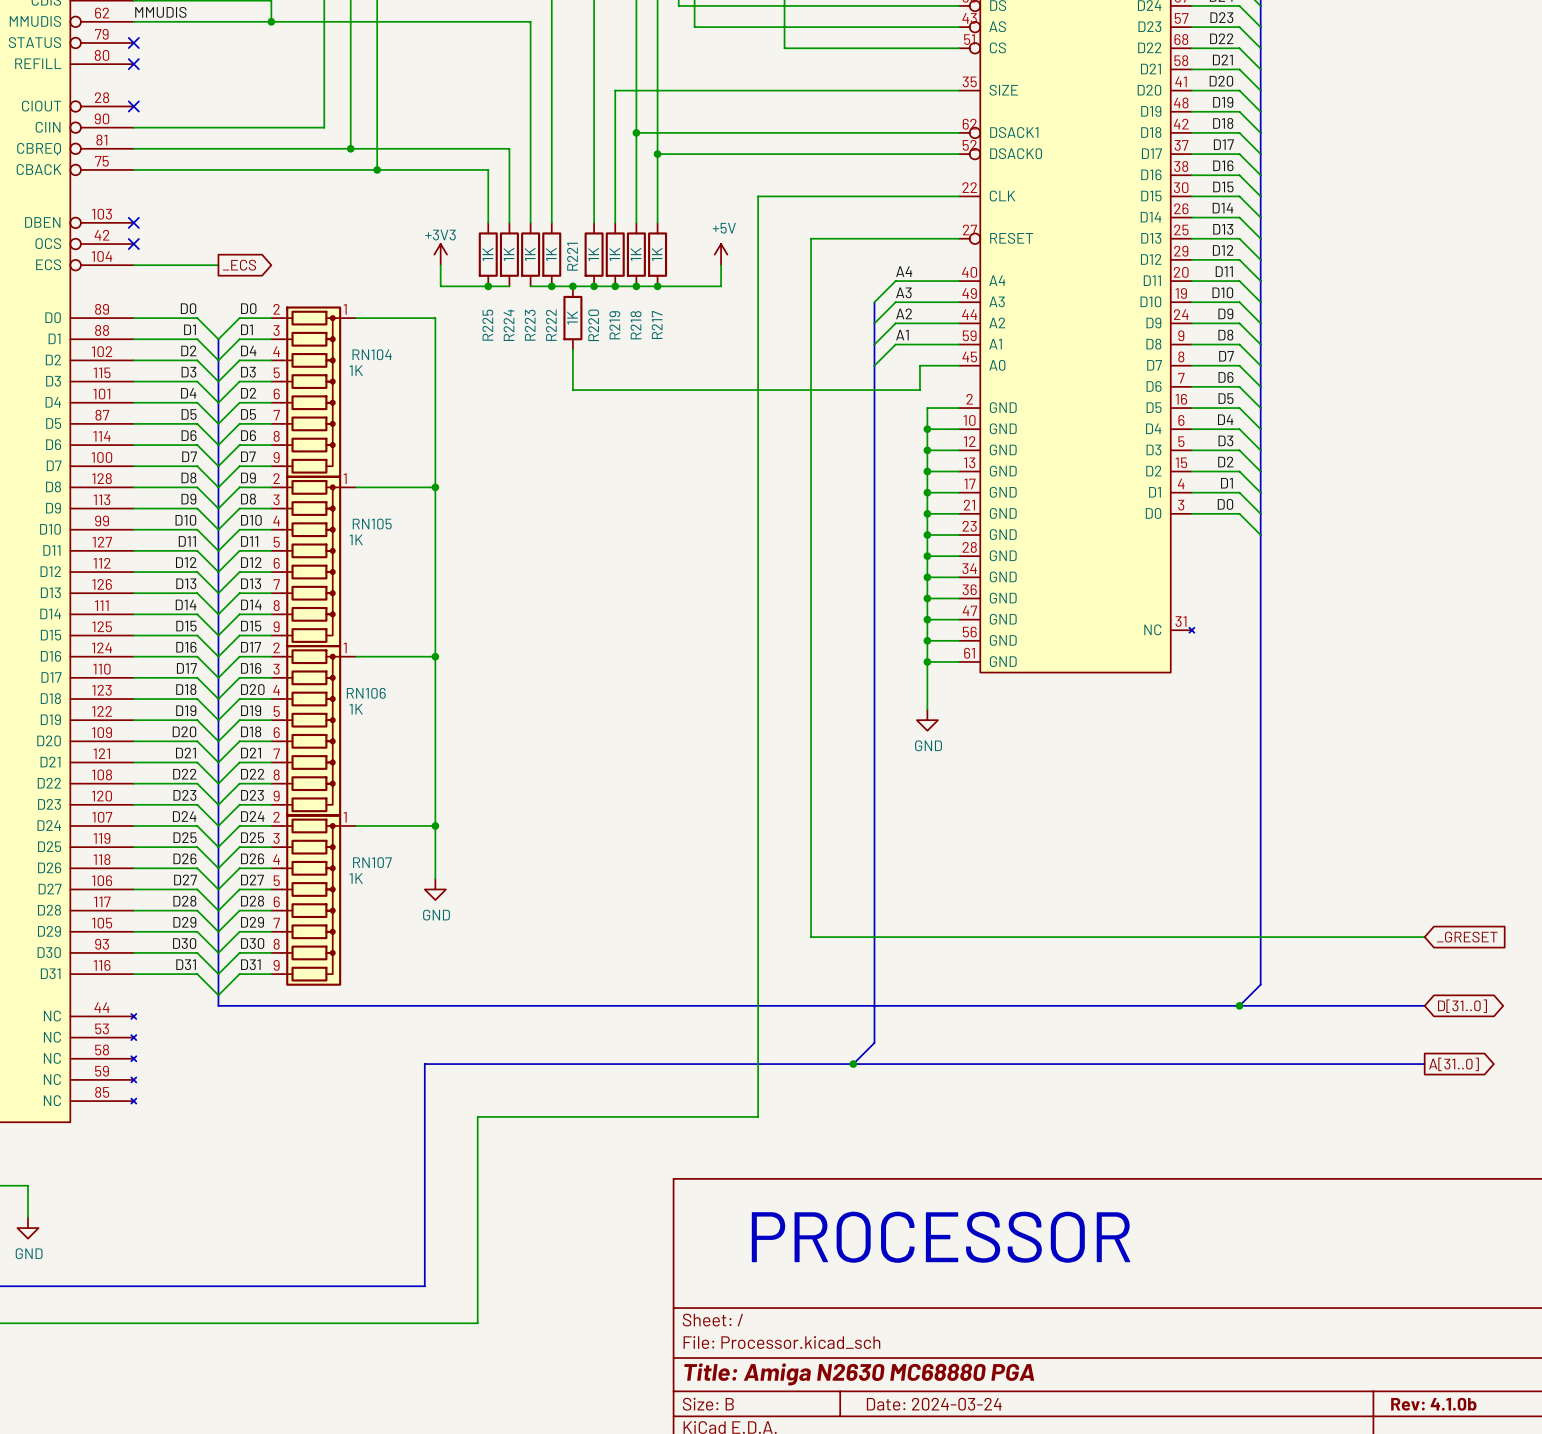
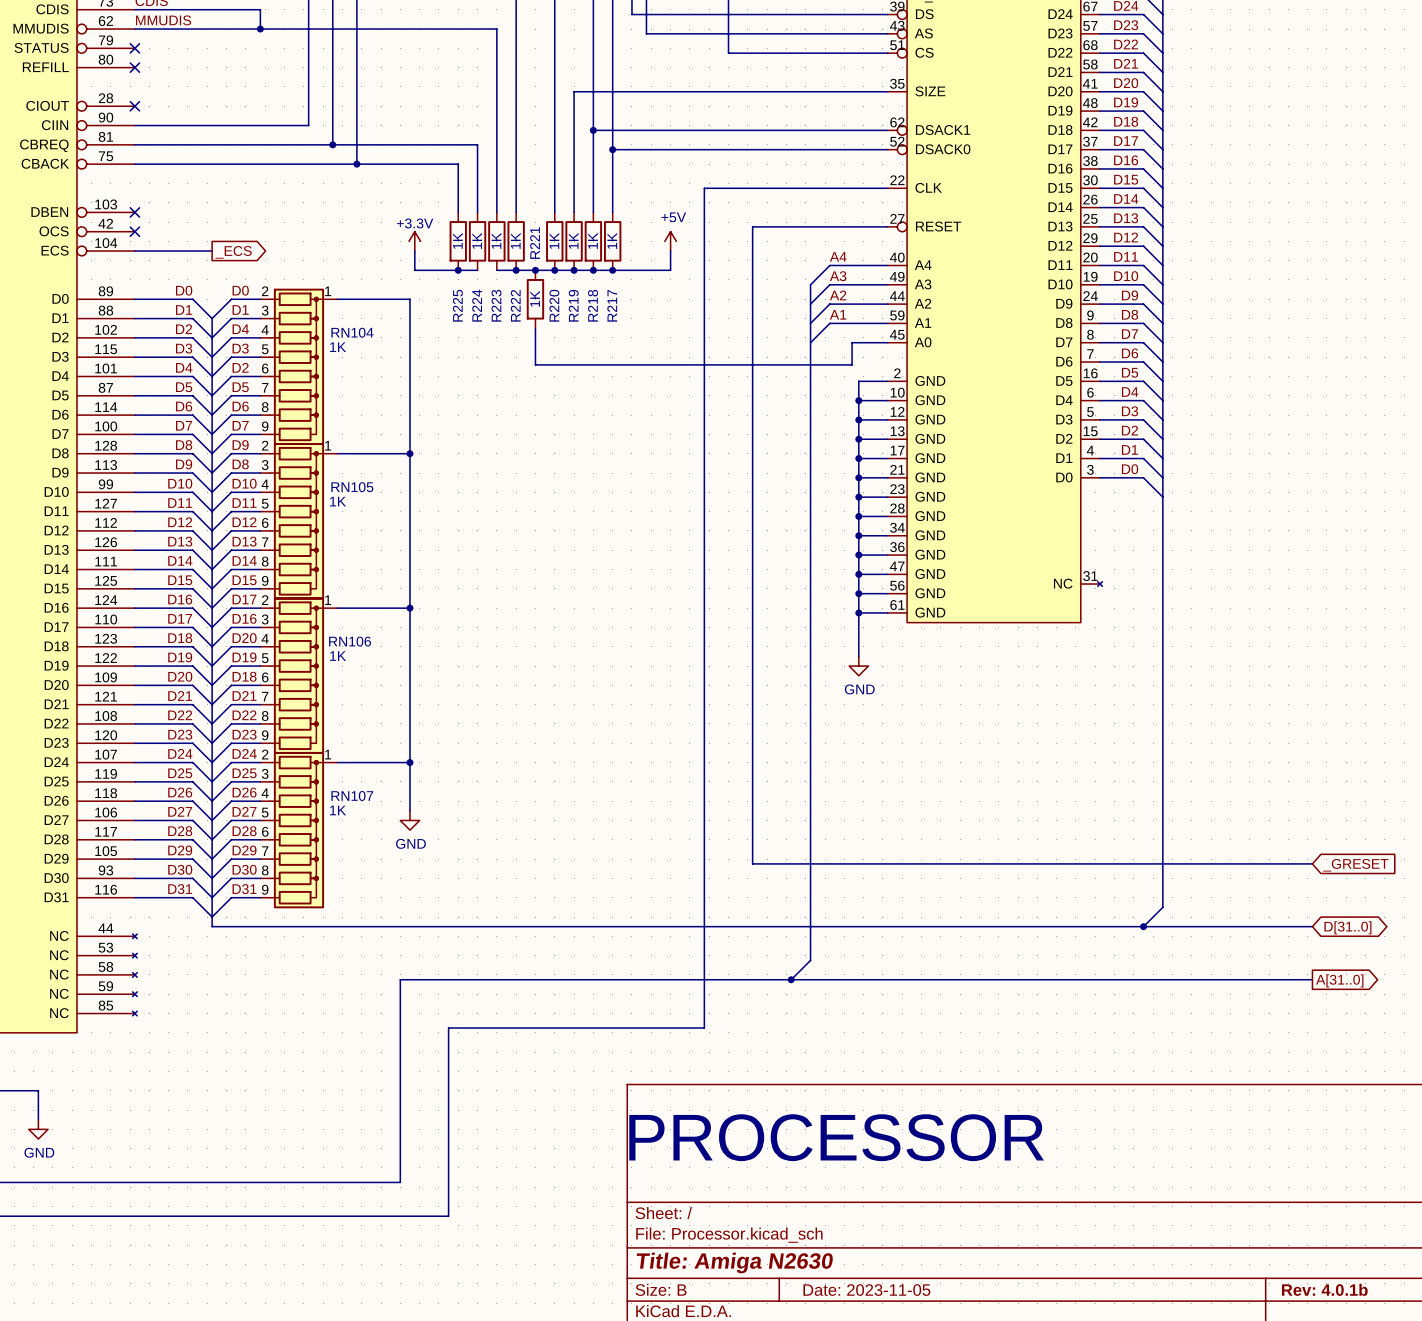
power symbol: +3V3 (440, 254) -> +3.3V (414, 241)
title block: Title: Amiga N2630 MC68880 PGA (859, 1374) -> Title: Amiga N2630 (734, 1262)
title block: Date: 2024-03-24 (934, 1404) -> Date: 2023-11-05 (866, 1290)
title block: Rev: 4.1.0b (1433, 1404) -> Rev: 4.0.1b (1324, 1289)

